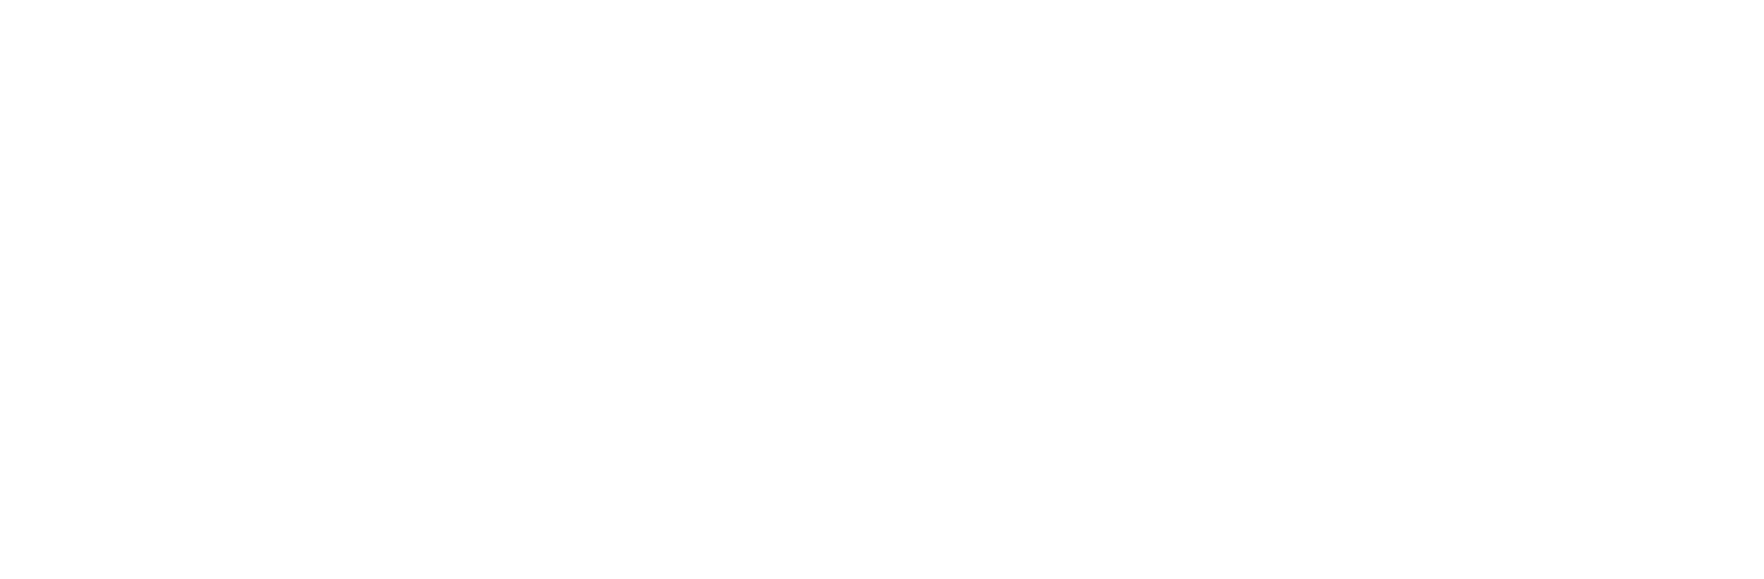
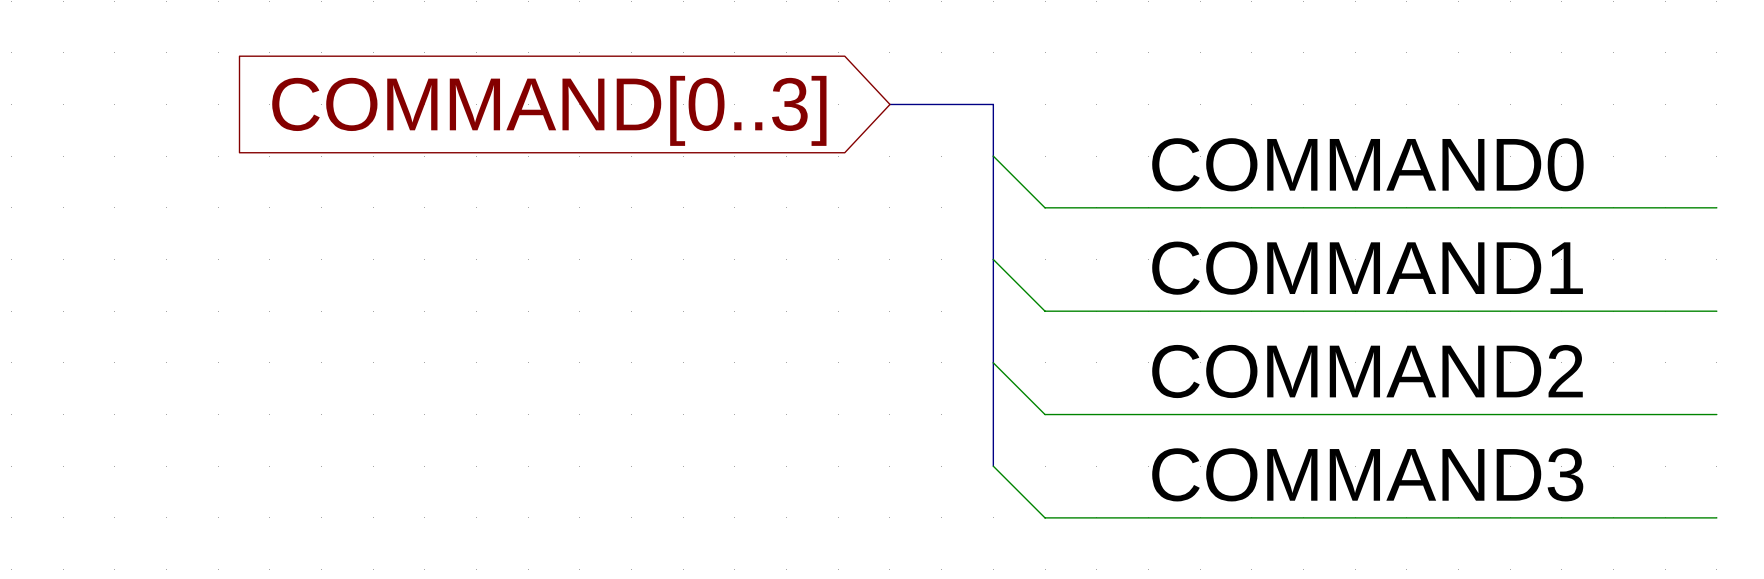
bus: none -> (889, 104) (993, 104) (993, 466)
global label: none -> COMMAND[0..3] (549, 110)
wire: none -> (993, 156) (1045, 207) (1716, 207)
label: none -> COMMAND0 (1367, 164)
wire: none -> (993, 259) (1045, 311) (1716, 311)
label: none -> COMMAND1 (1367, 268)
wire: none -> (993, 362) (1045, 414) (1716, 414)
label: none -> COMMAND2 (1367, 371)
wire: none -> (993, 466) (1045, 517) (1716, 517)
label: none -> COMMAND3 (1367, 474)

